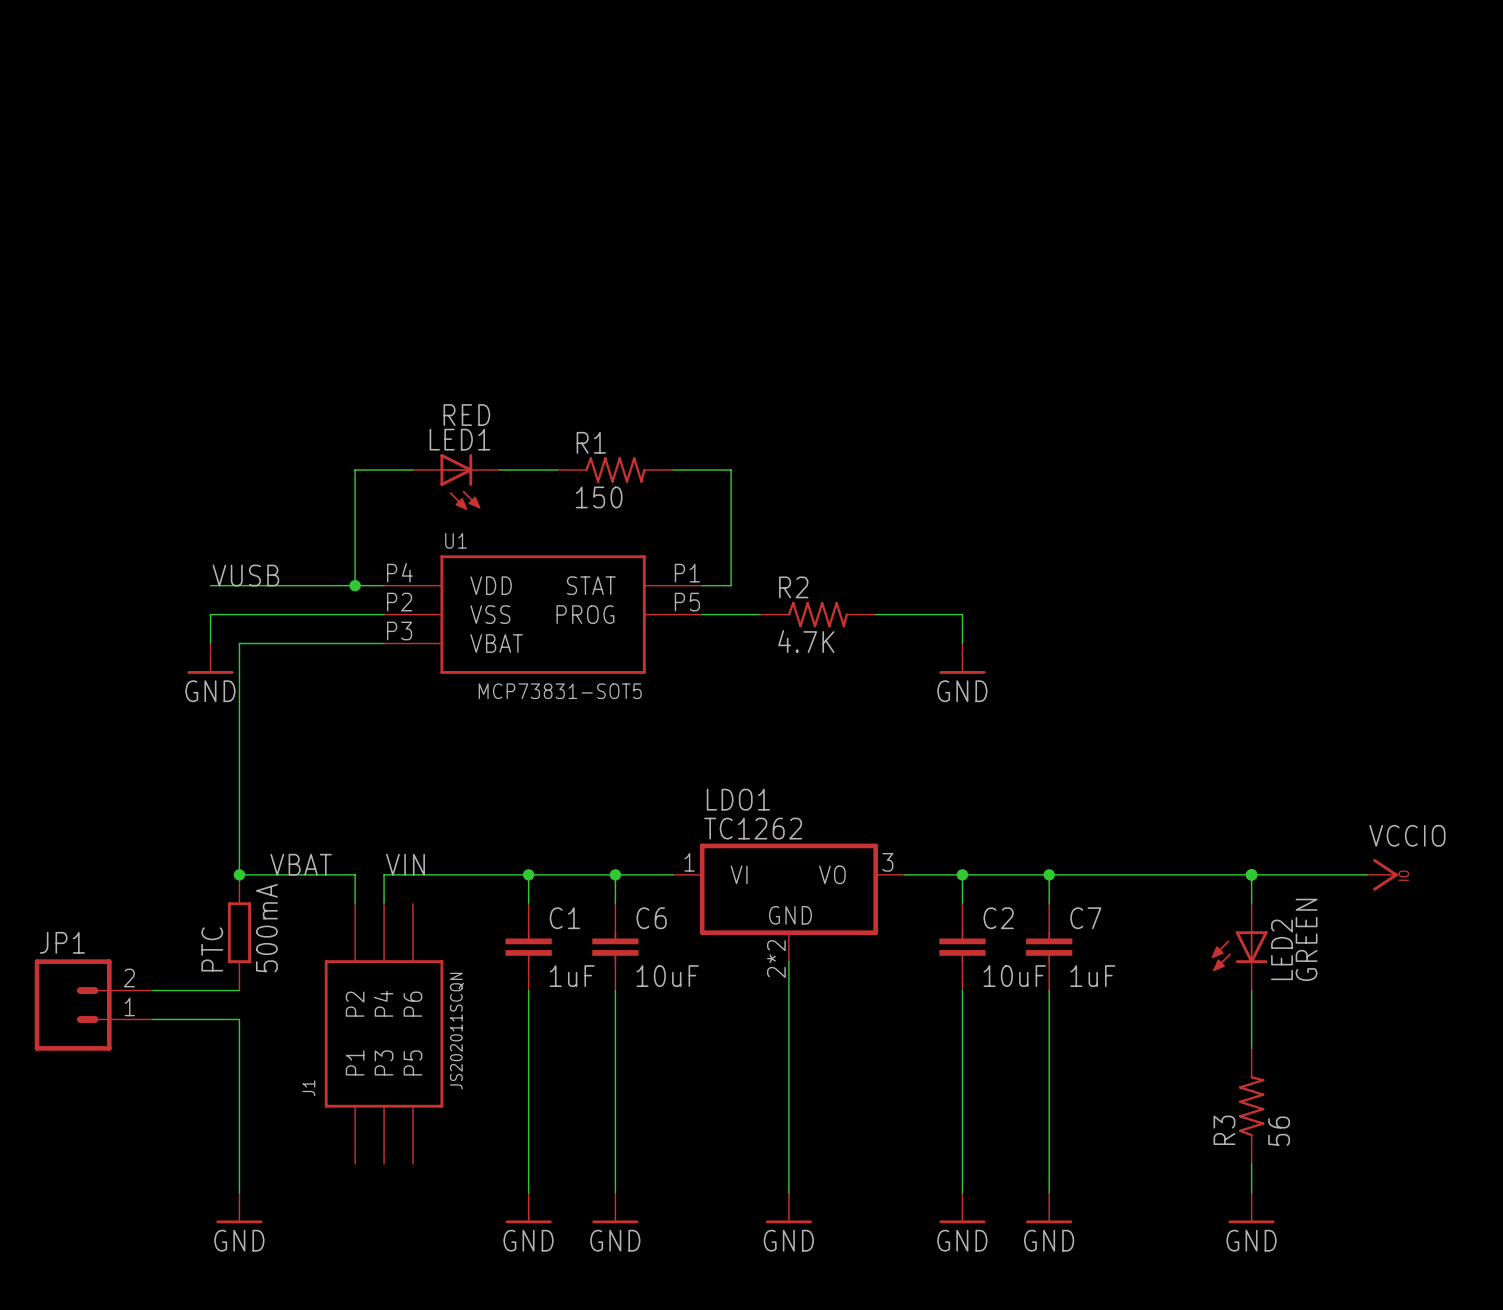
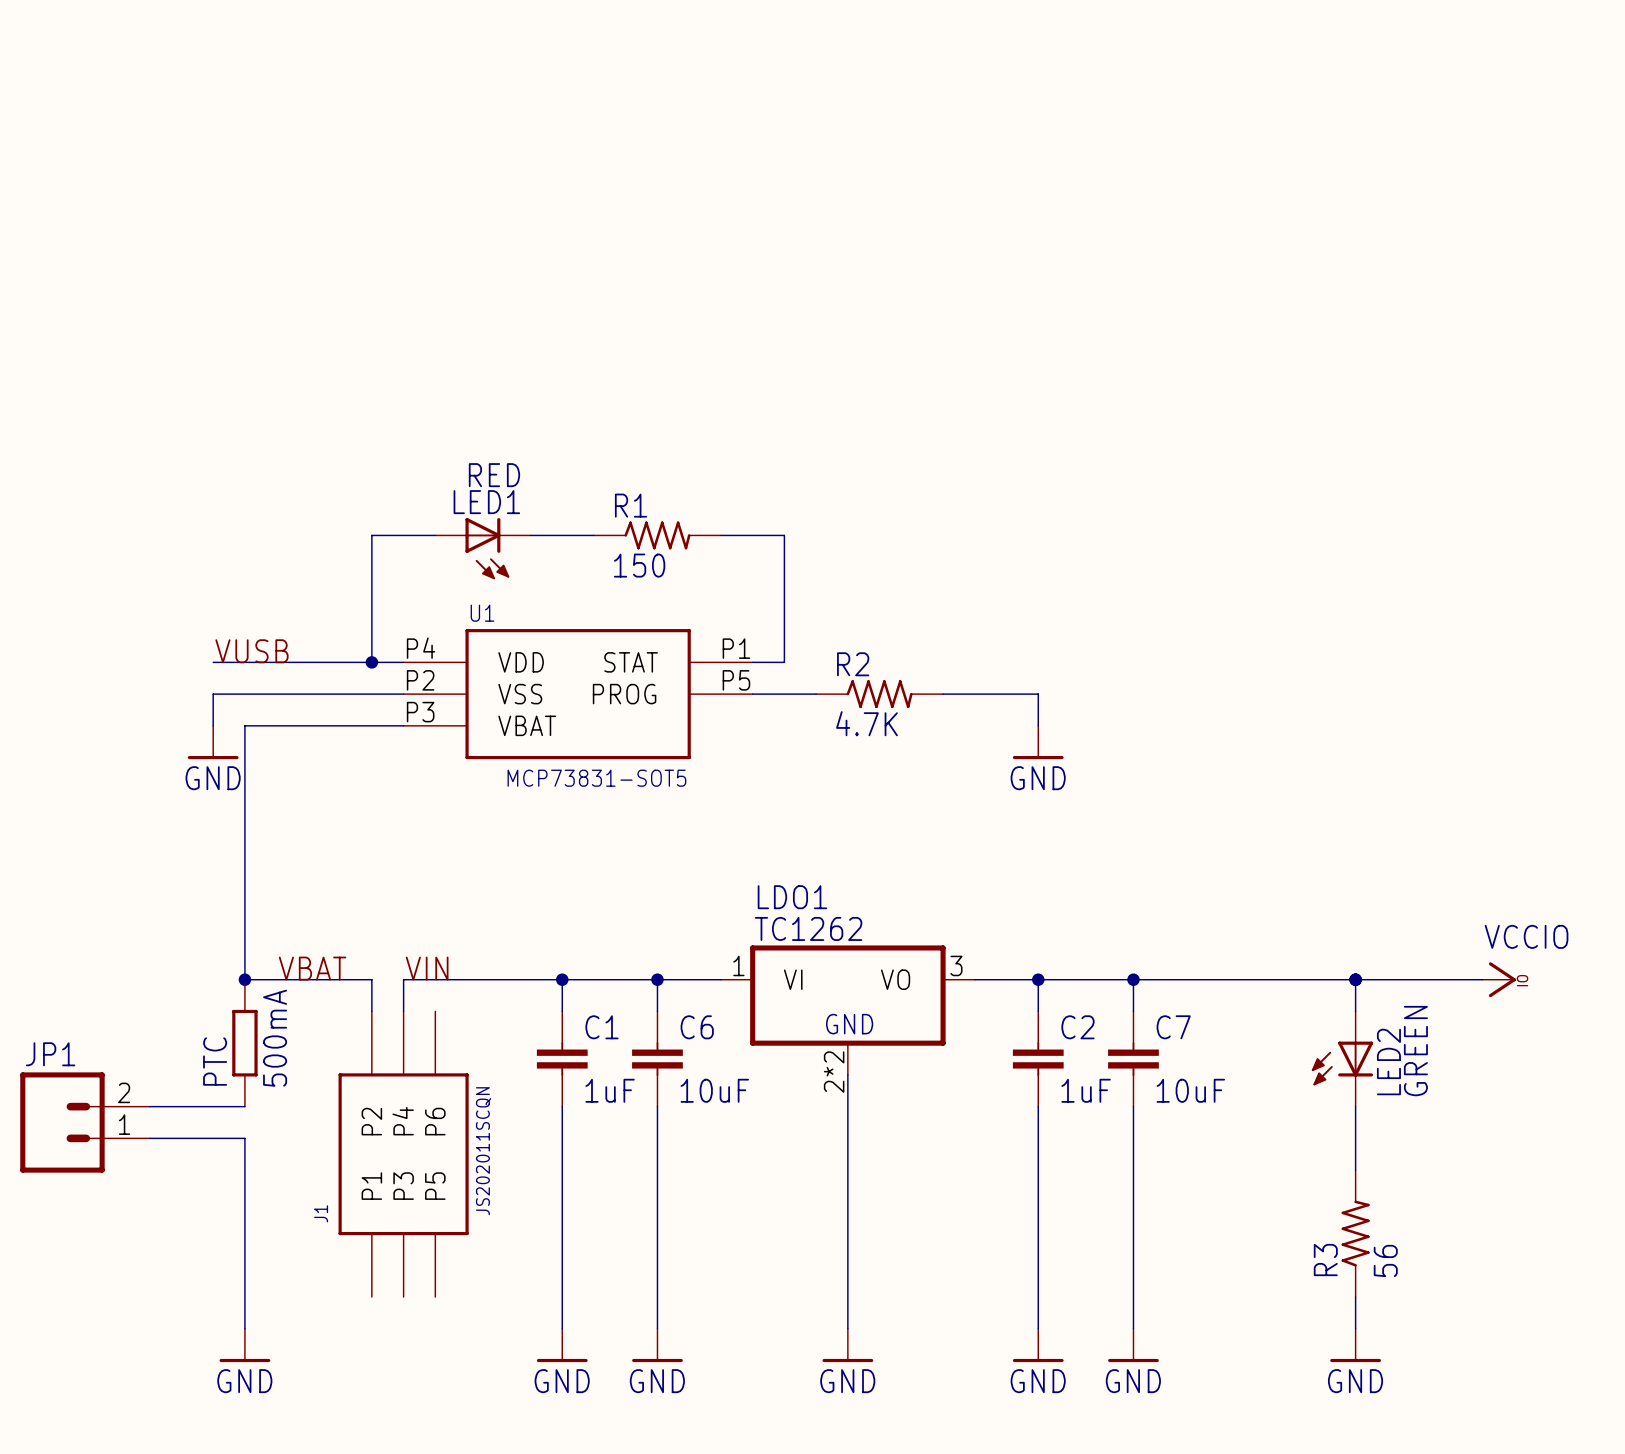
C2 value: 10uF (1014, 976) -> 1uF (1086, 1090)
C7 value: 1uF (1092, 976) -> 10uF (1190, 1090)

